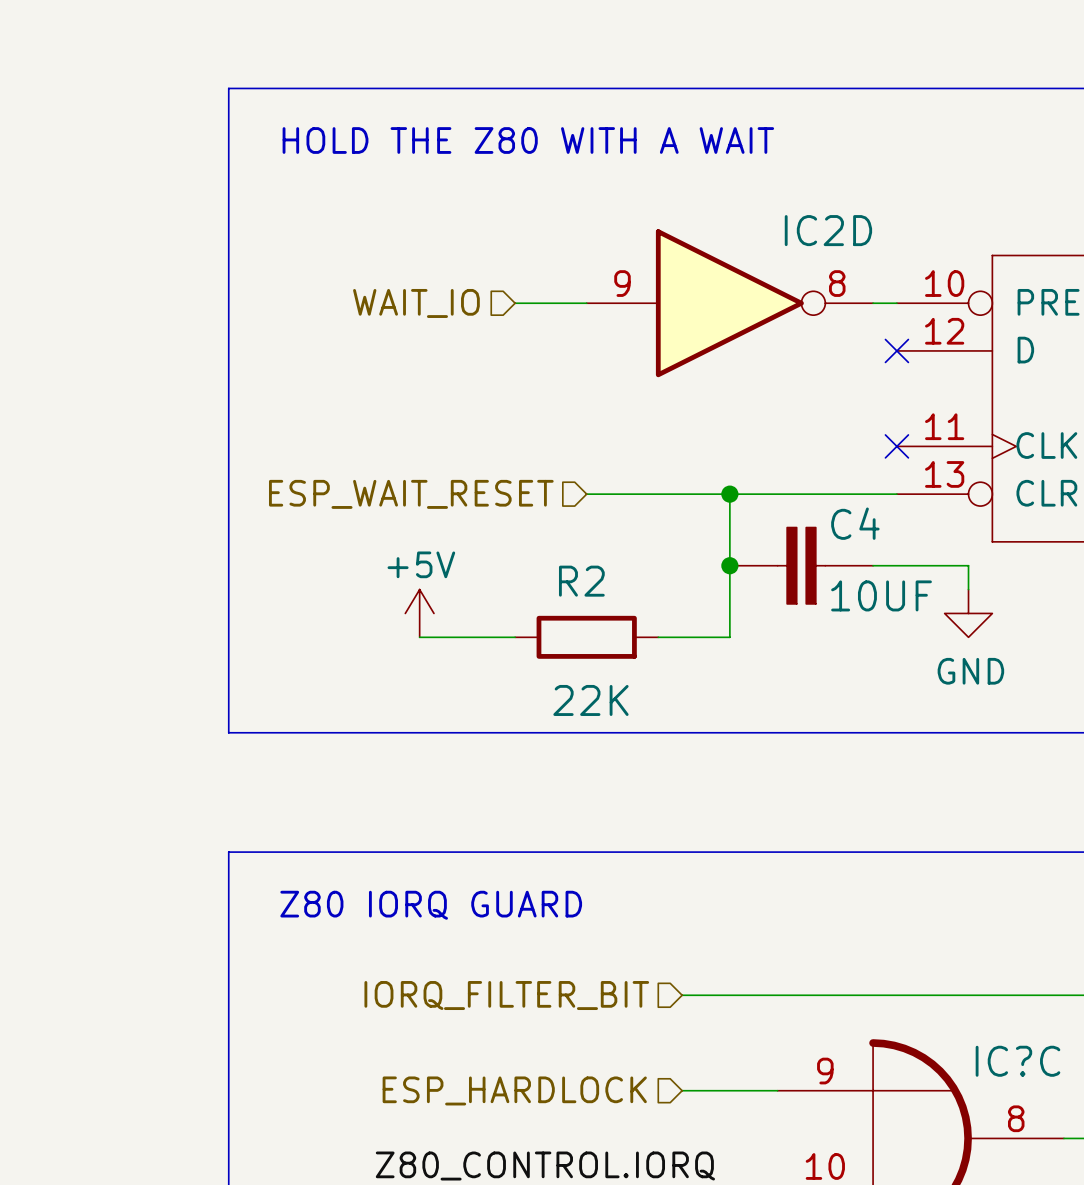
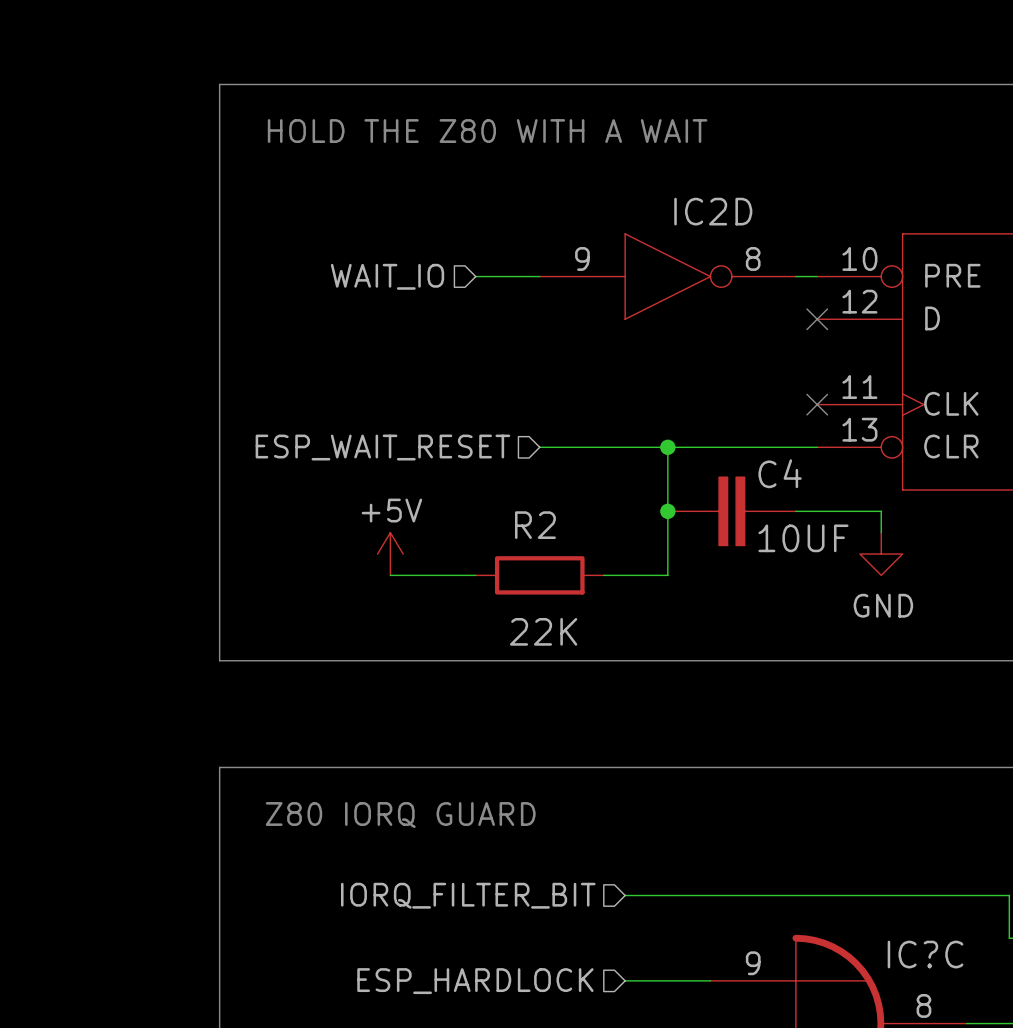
IC2D symbol: [586, 229, 874, 378] -> [539, 233, 796, 320]
IC2D name position: IC2D (828, 230) -> IC2D (713, 211)

